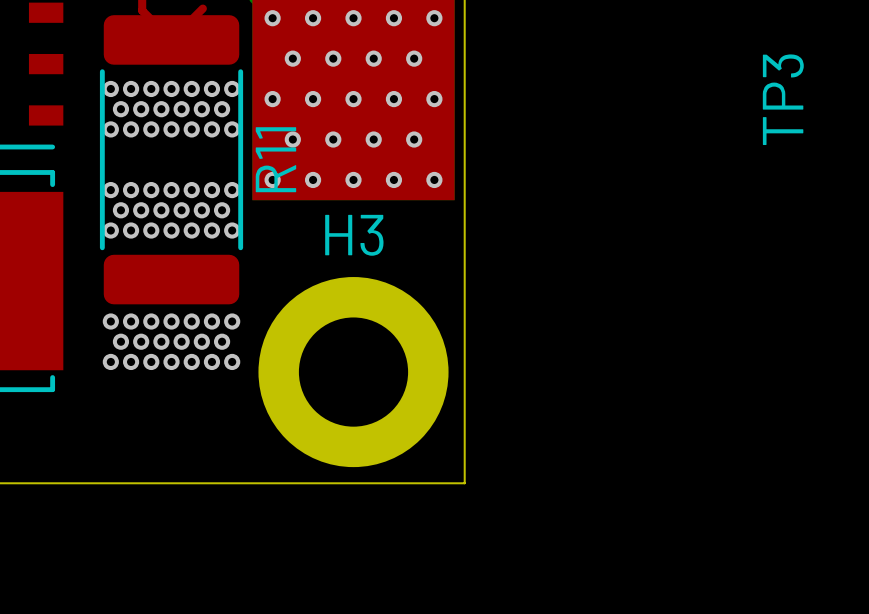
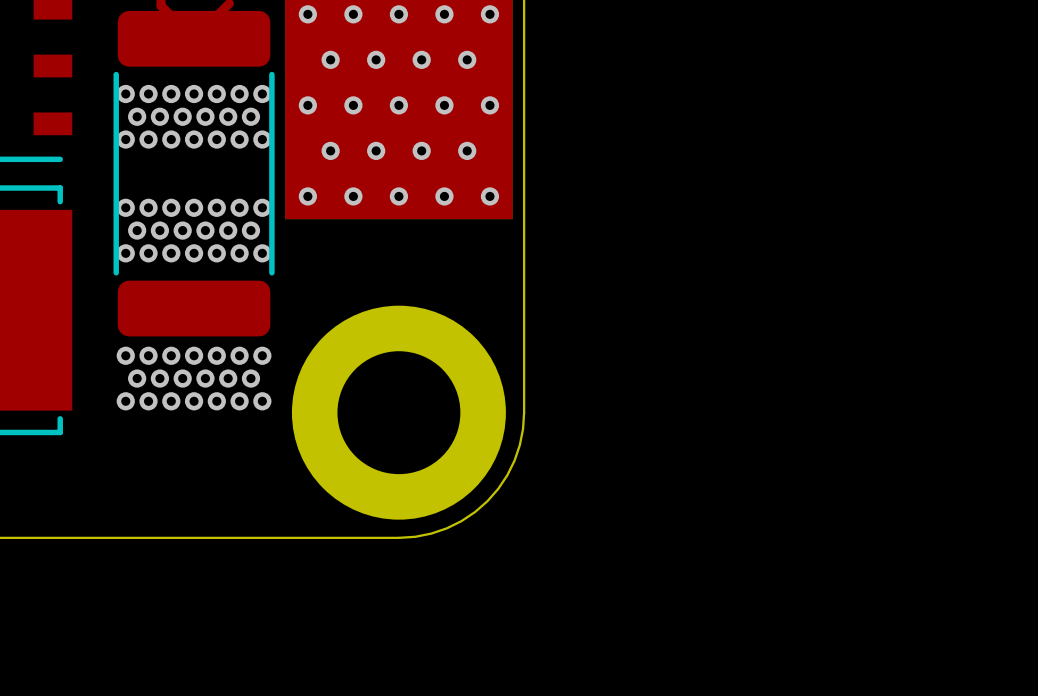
TP3 name: TP3 (783, 99) -> none
R11 name: R11 (275, 159) -> none
H3 name: H3 (354, 235) -> none
board edge: (464, 372) (464, 483) (353, 483) -> (524, 412) (519, 445) (514, 460) (498, 488) (487, 501) (461, 521) (446, 528) (415, 536) (398, 537)

